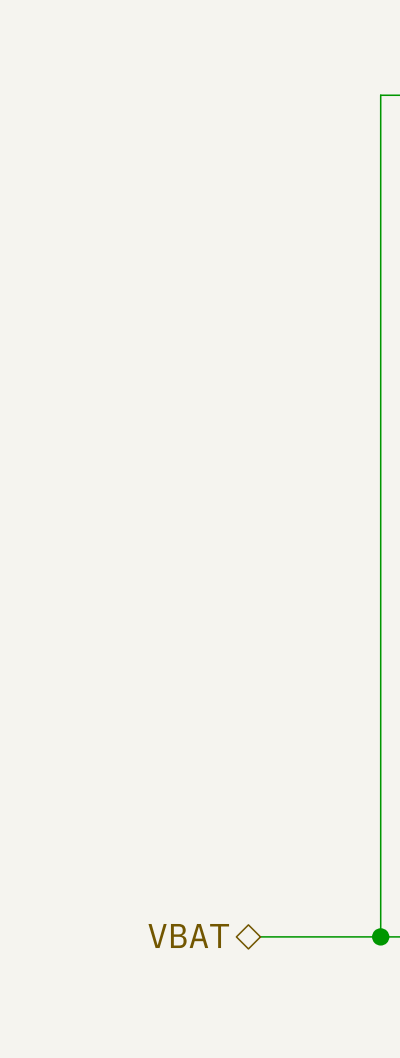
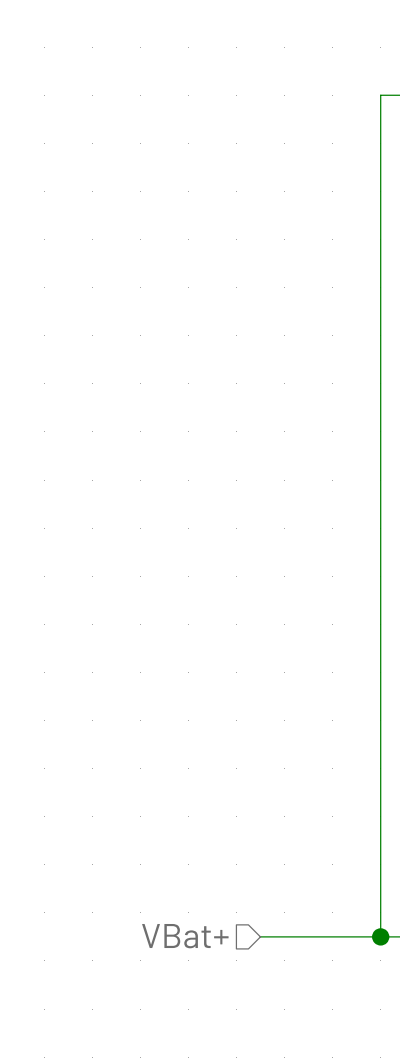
hierarchical label shape: bidirectional (188, 936) -> input (185, 936)
hierarchical label: VBAT (188, 936) -> VBat+ (185, 936)

